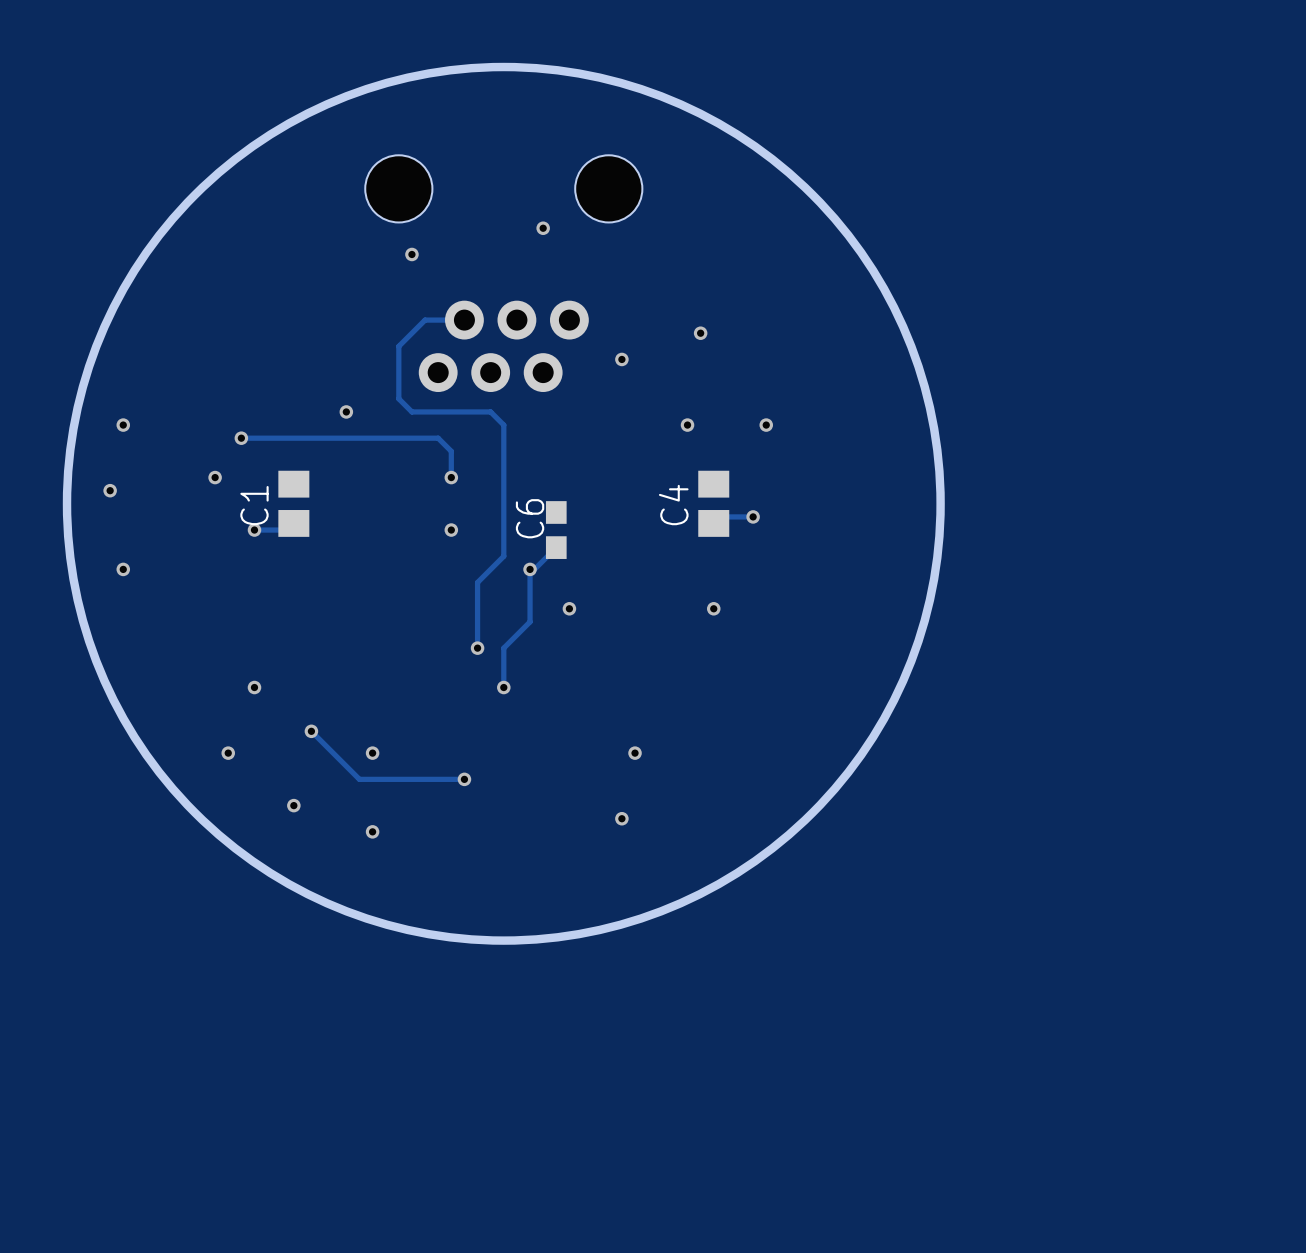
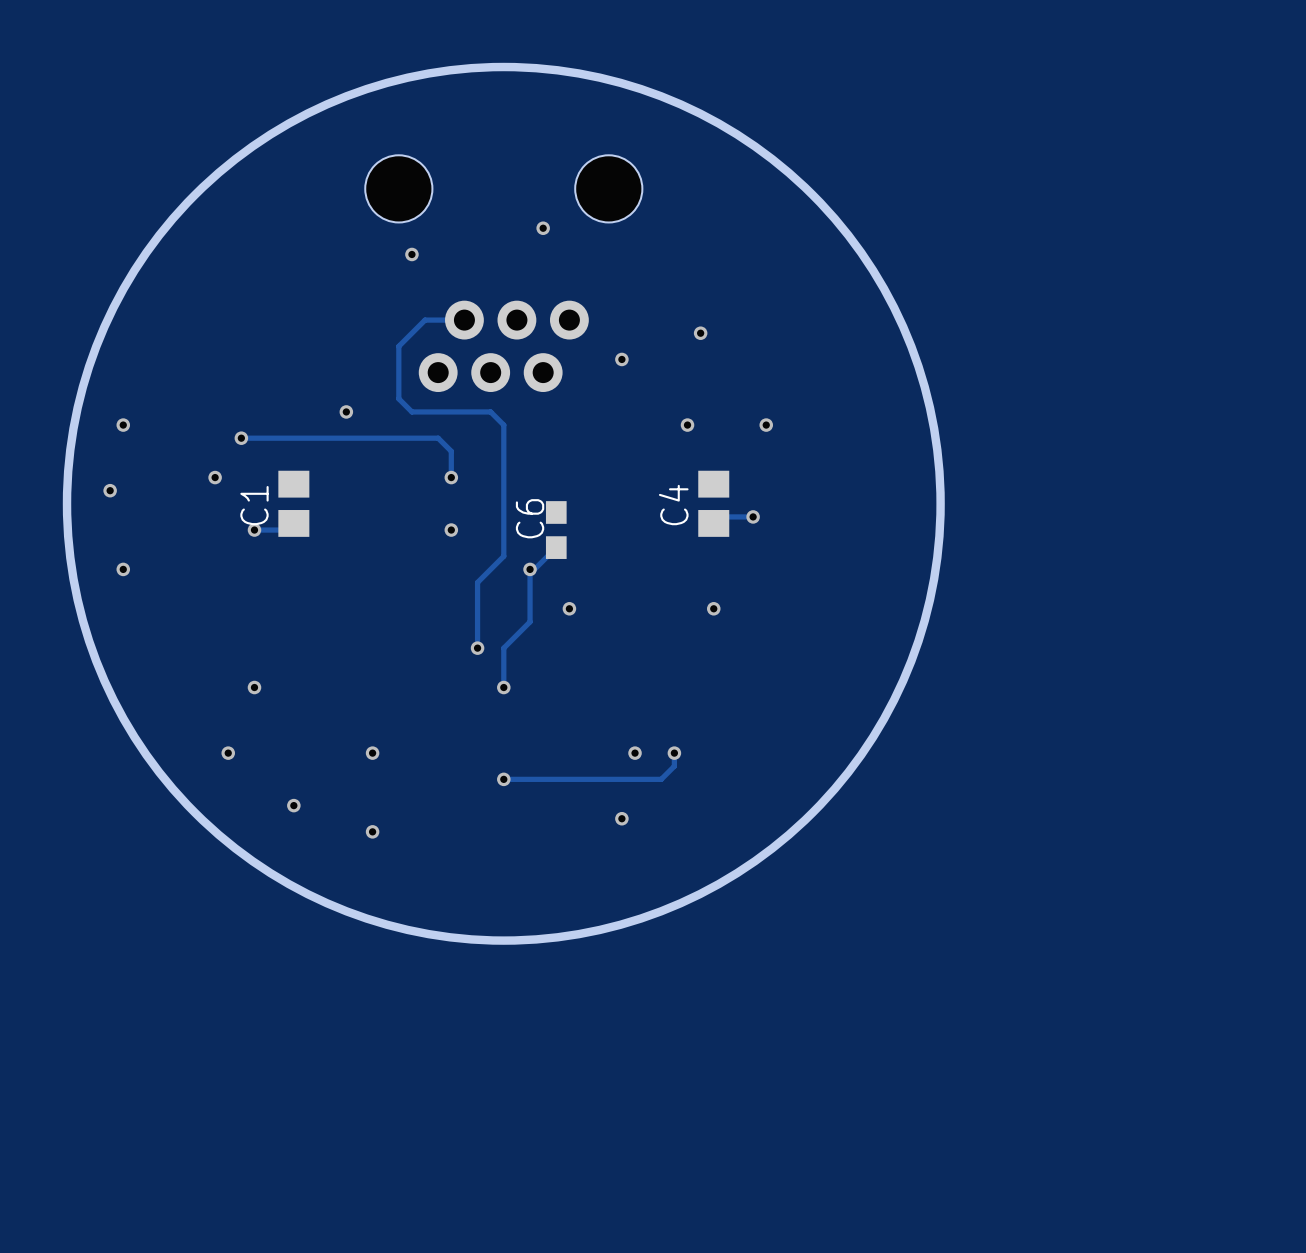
track: (311, 731) (359, 779) (464, 779) -> none
via: (311, 731) -> none
track: none -> (674, 753) (674, 766) (661, 779) (503, 779)
via: none -> (674, 753)
via position: (464, 779) -> (503, 779)

